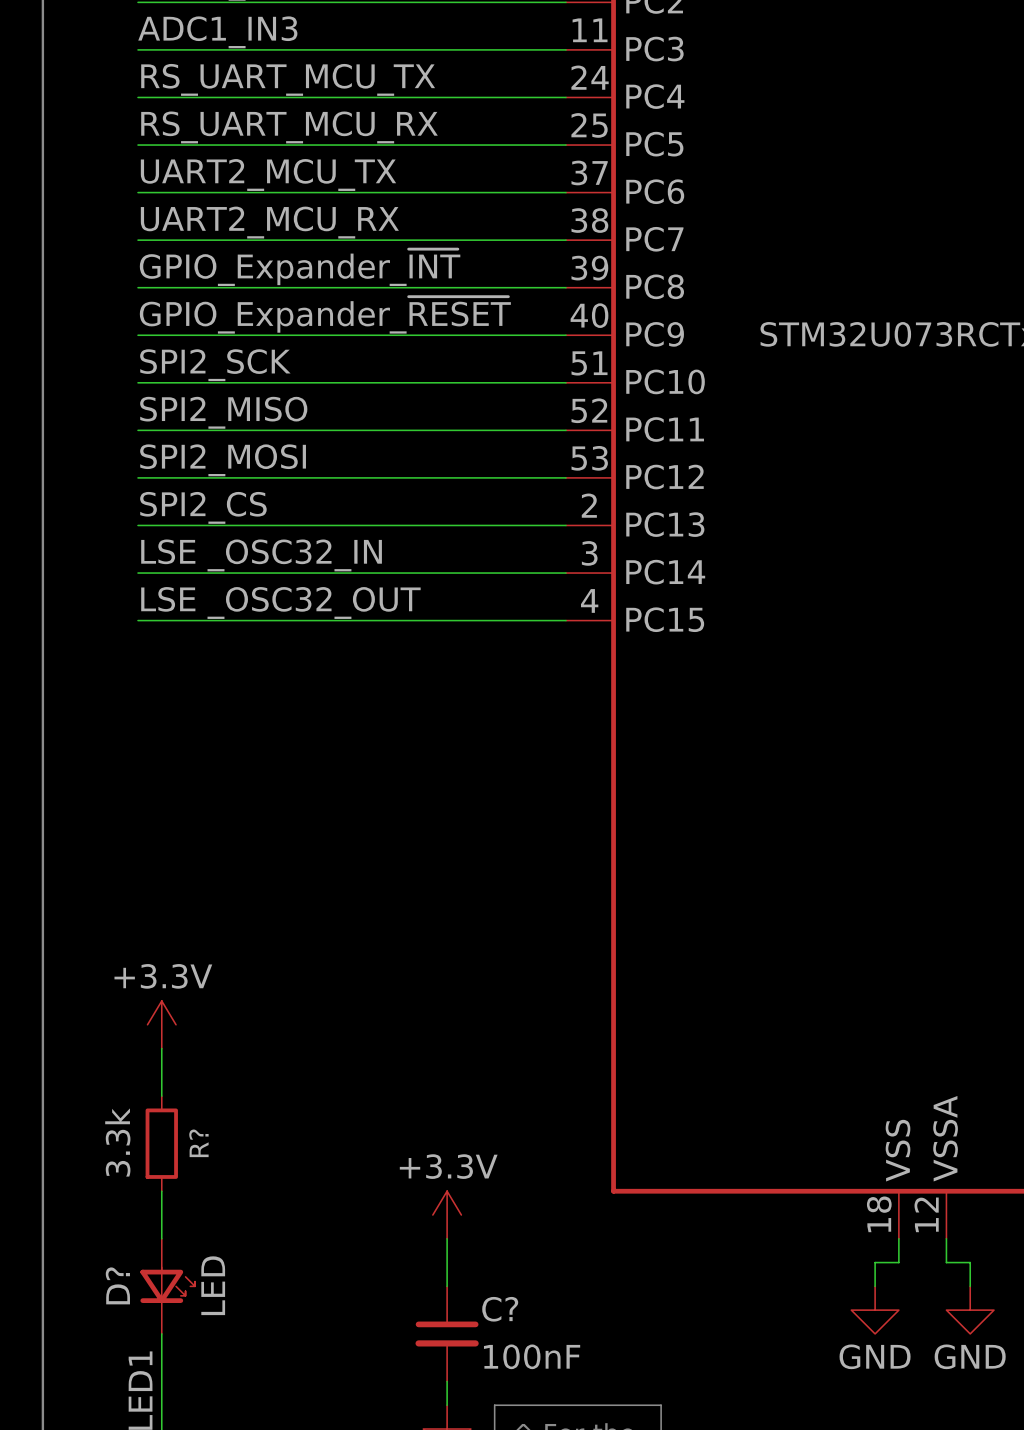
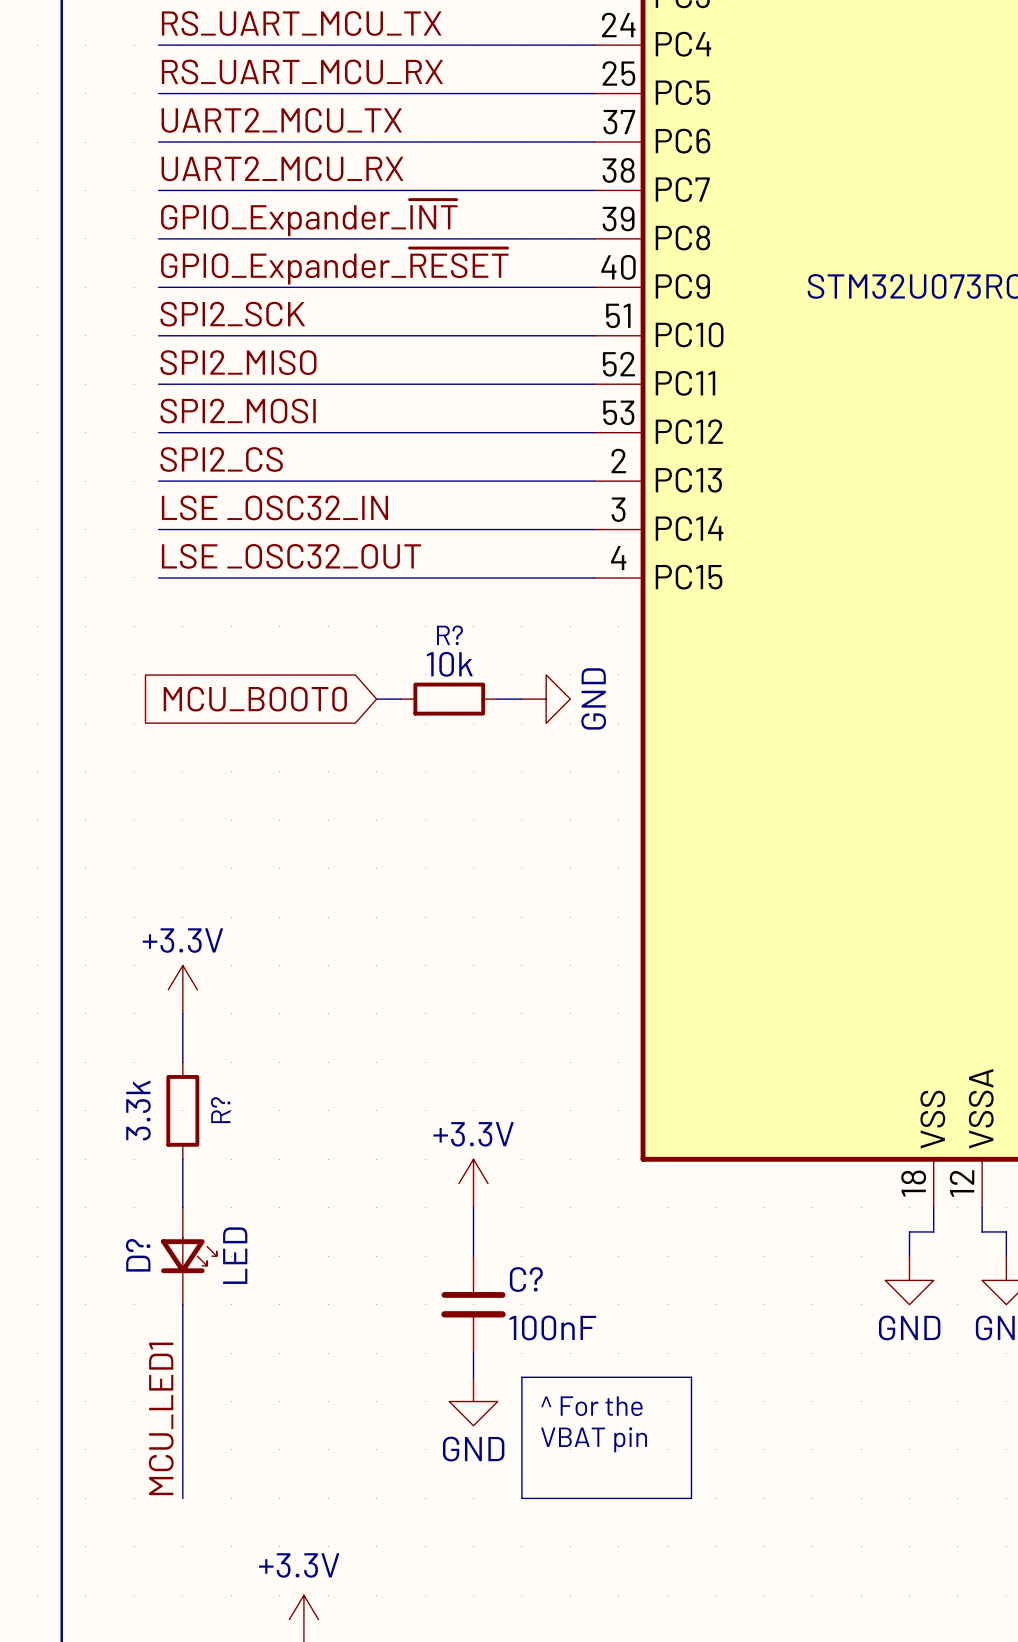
wire: none -> (376, 699) (400, 699)
R?: none -> 10k (449, 699)
wire: none -> (497, 699) (521, 699)
power symbol: none -> GND (546, 699)
global label: none -> MCU_BOOT0 (255, 699)

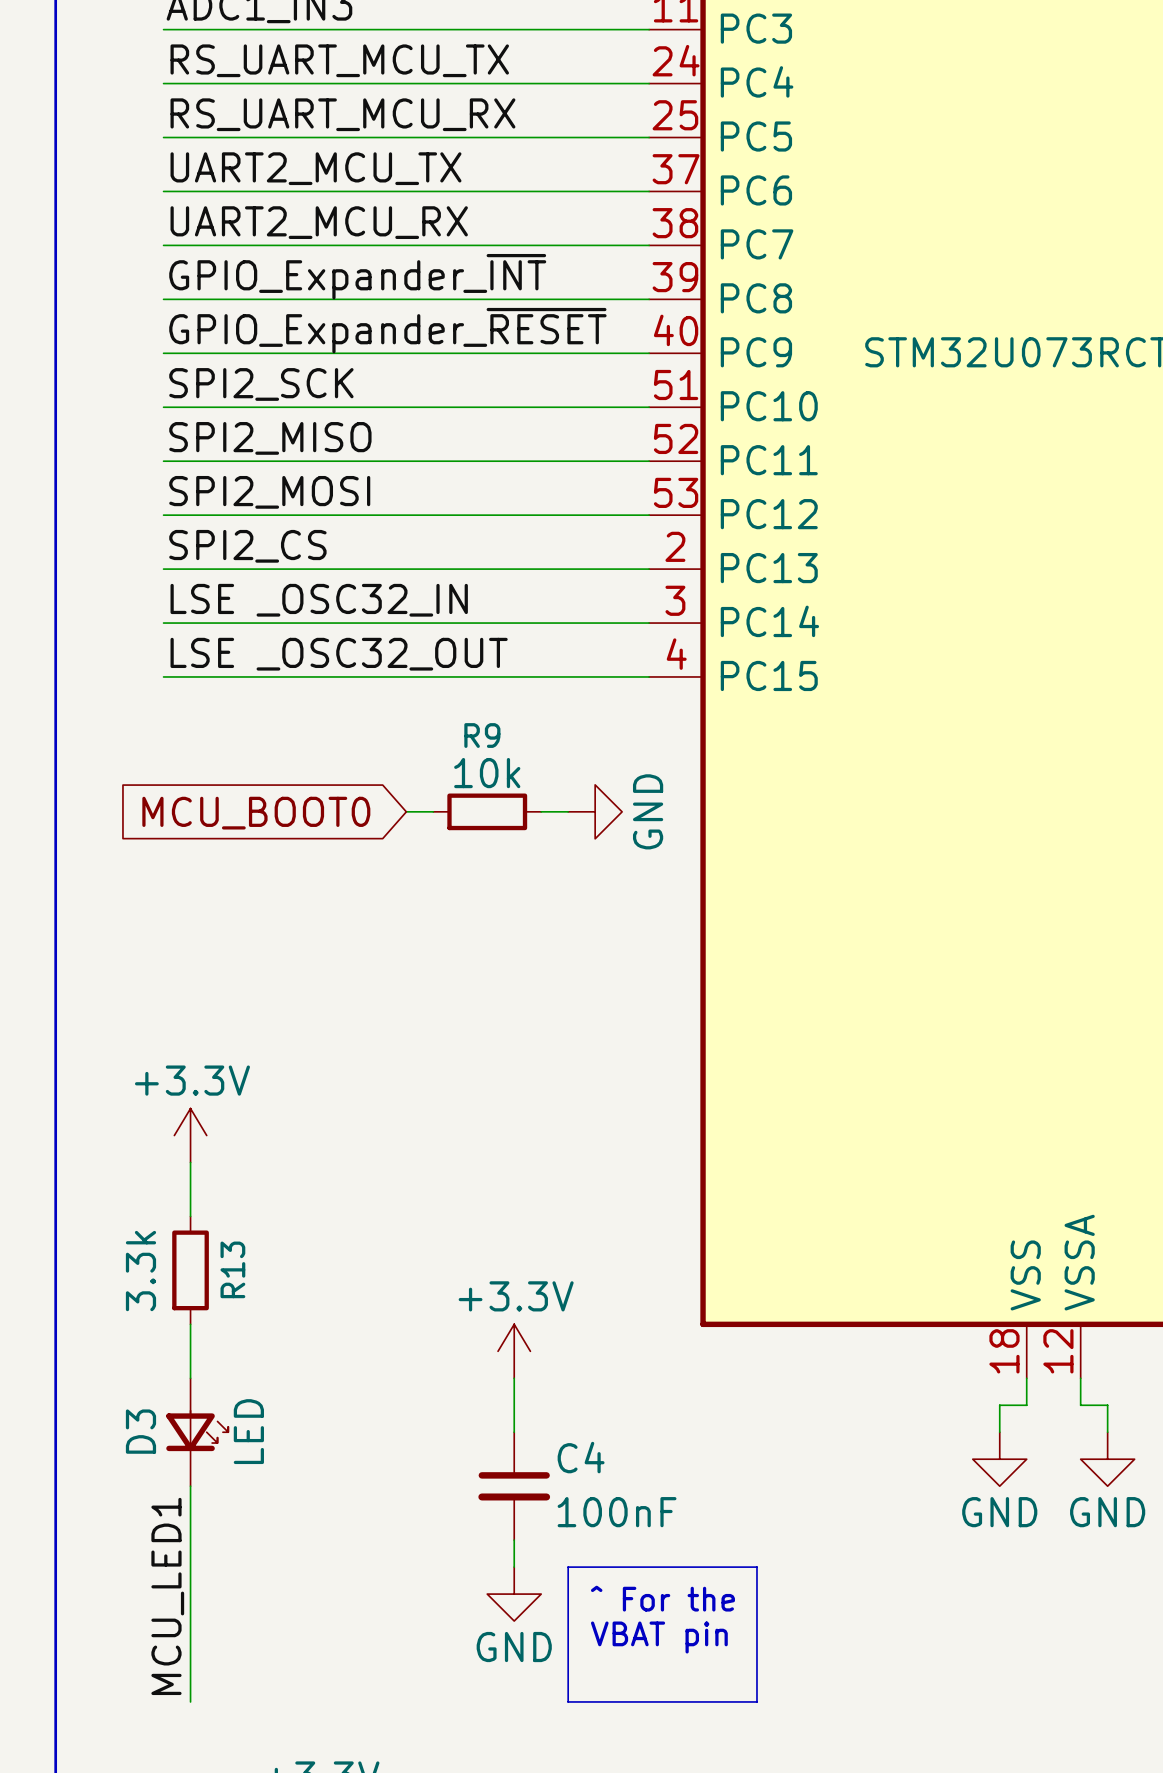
R? name: R? (449, 635) -> R9 (482, 735)
R? name: R? (220, 1110) -> R13 (232, 1269)
D? name: D? (138, 1255) -> D3 (140, 1431)
C? name: C? (526, 1279) -> C4 (581, 1457)

